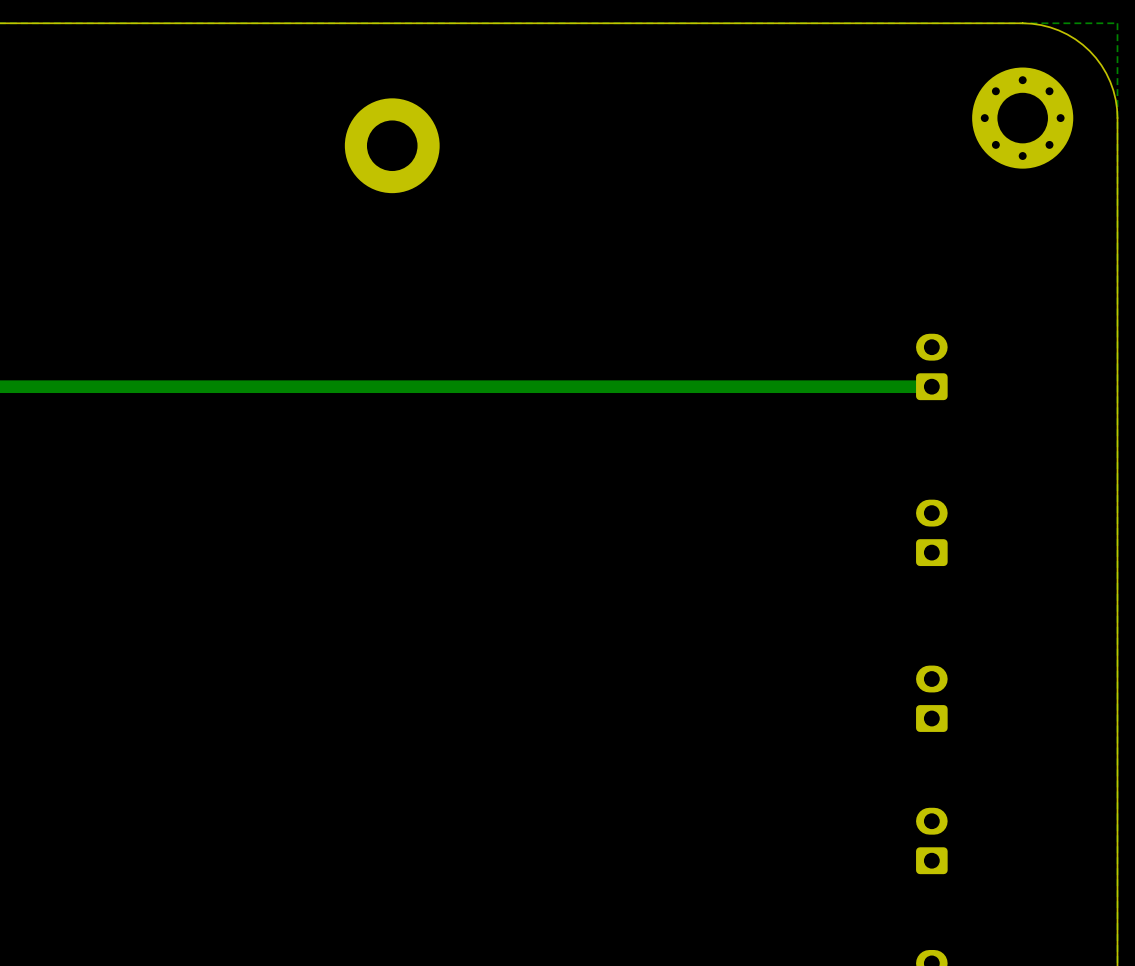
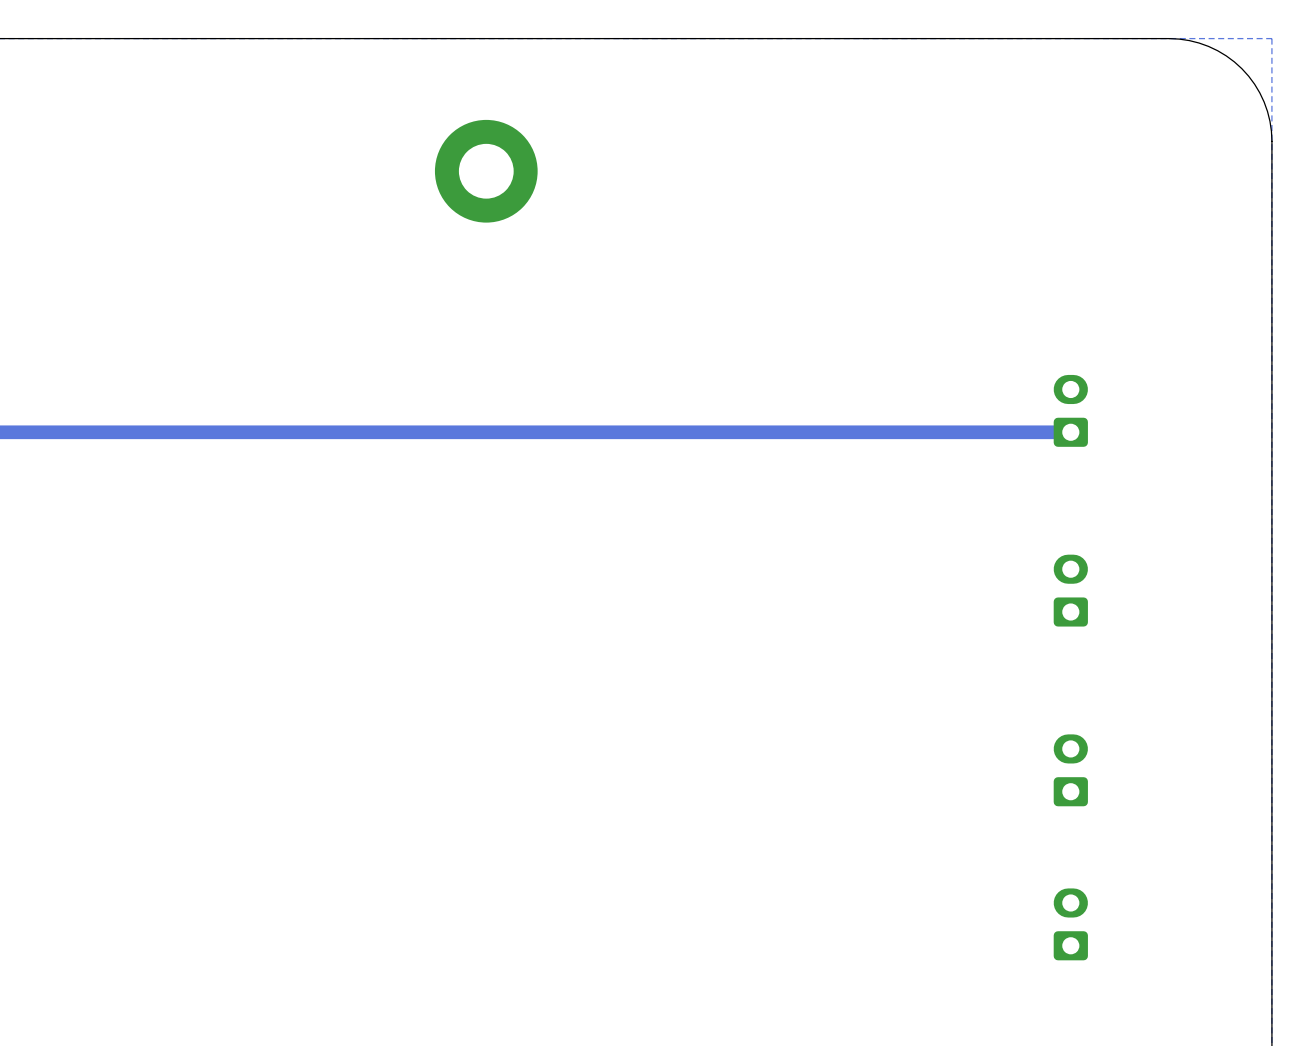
part: (1022, 118) -> none

